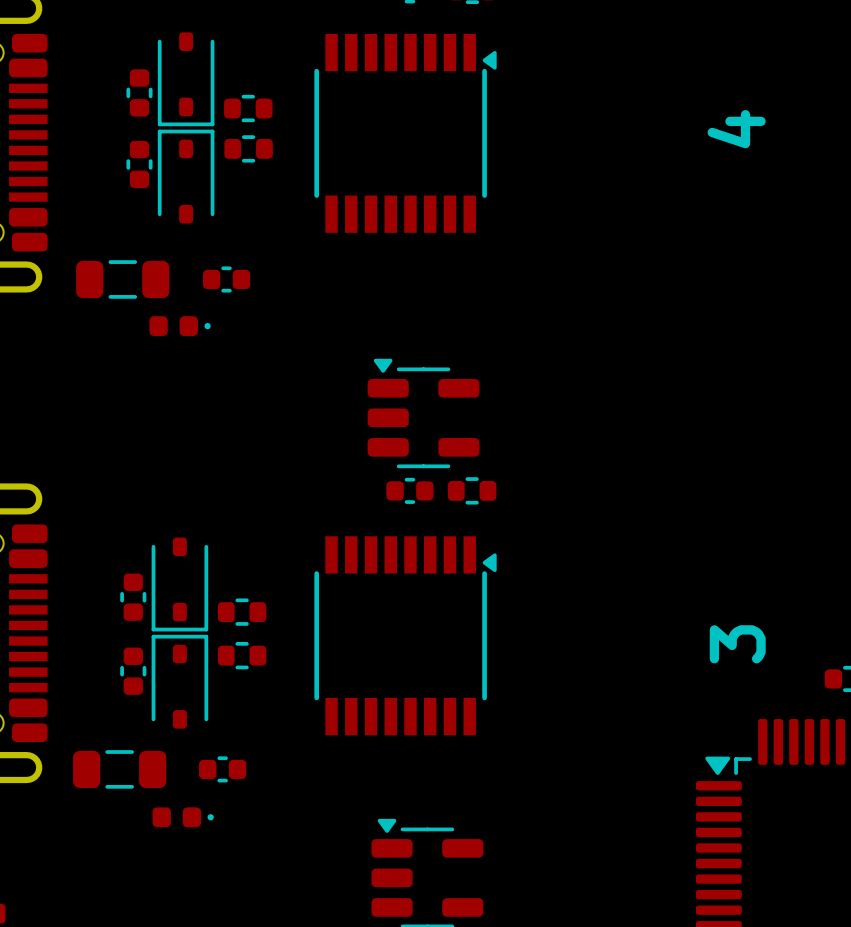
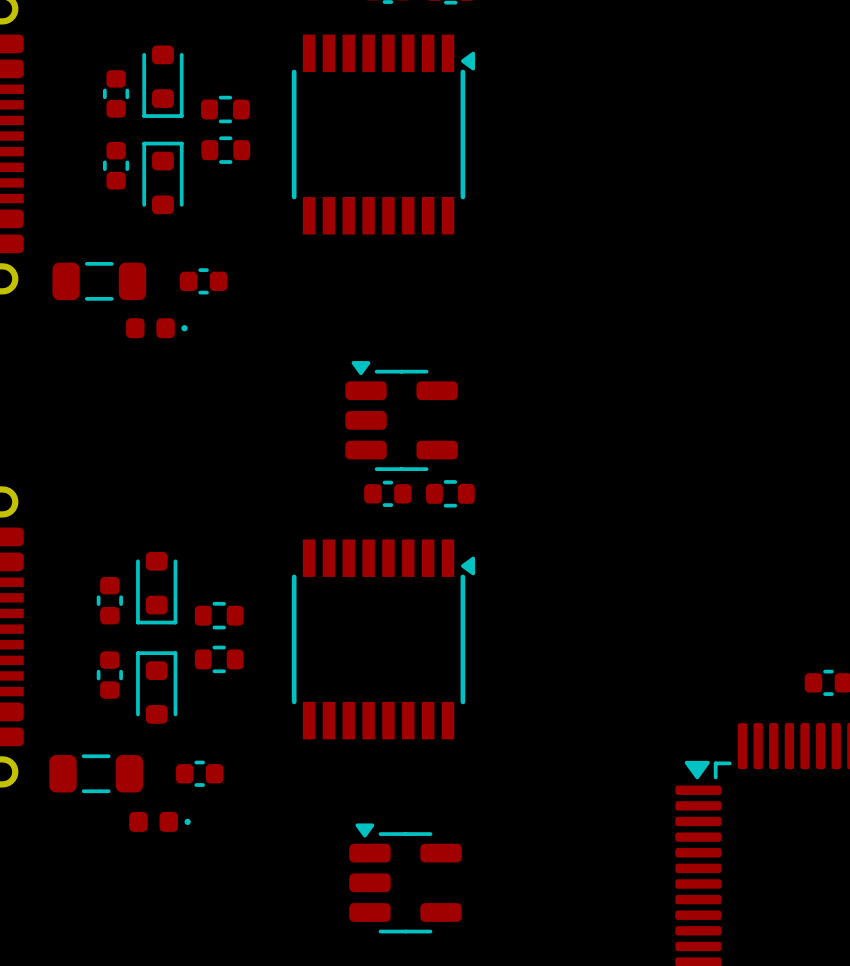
part footprint: [157, 32, 215, 127] -> [142, 45, 184, 118]
part footprint: [157, 129, 215, 224] -> [142, 141, 184, 215]
text: 4 (736, 129) -> none
part footprint: [151, 537, 209, 632] -> [136, 551, 178, 625]
part footprint: [151, 634, 209, 729] -> [136, 651, 178, 724]
text: 3 (737, 644) -> none

